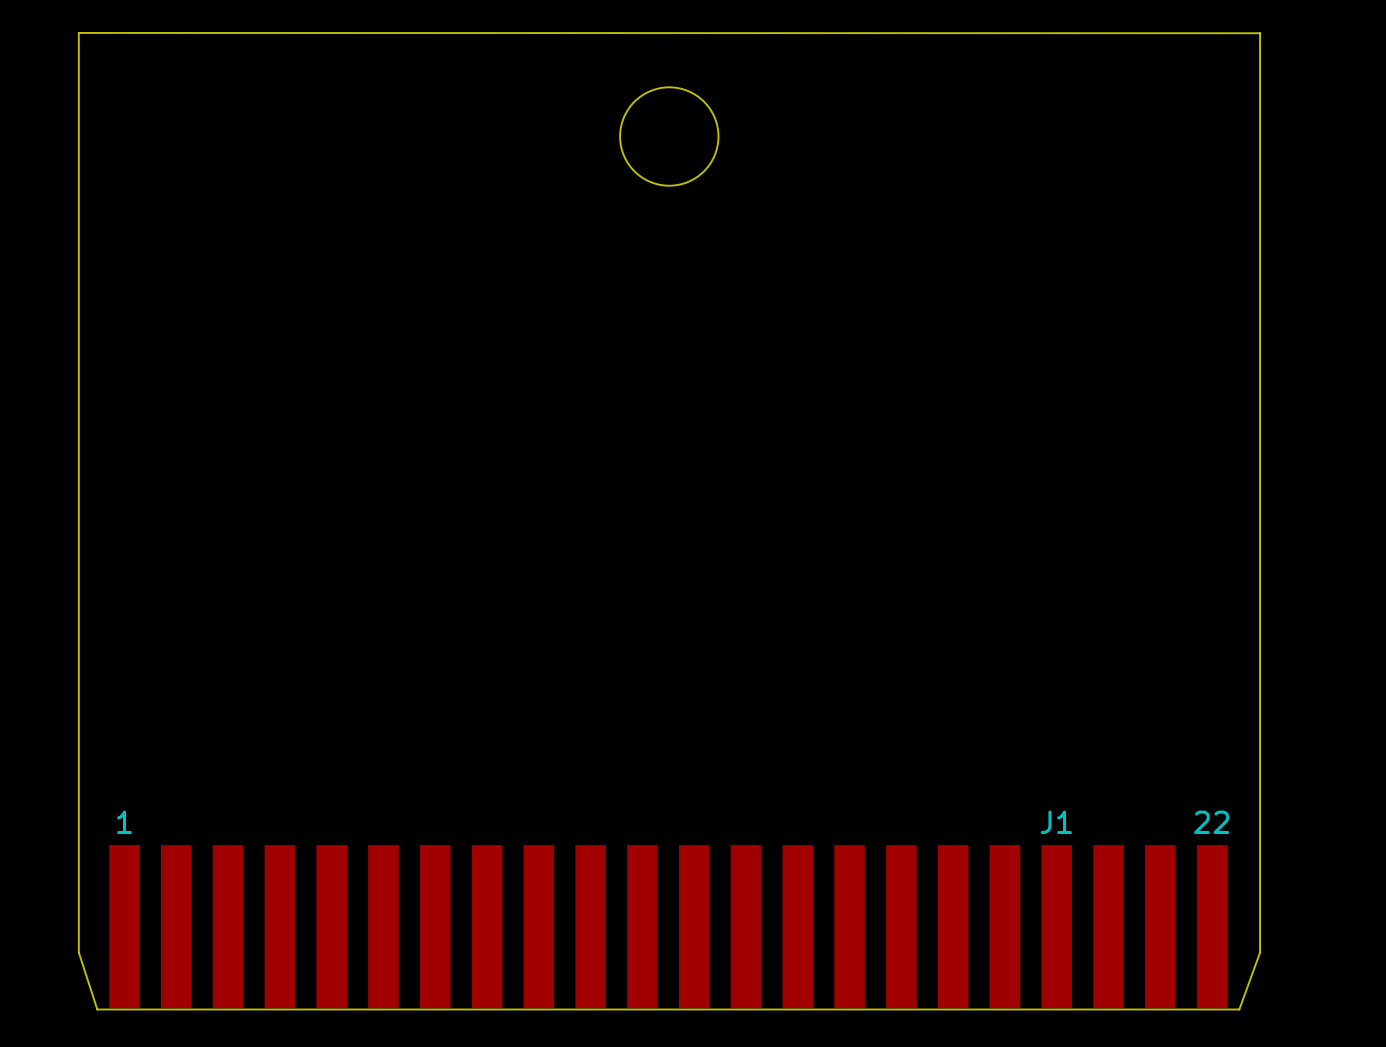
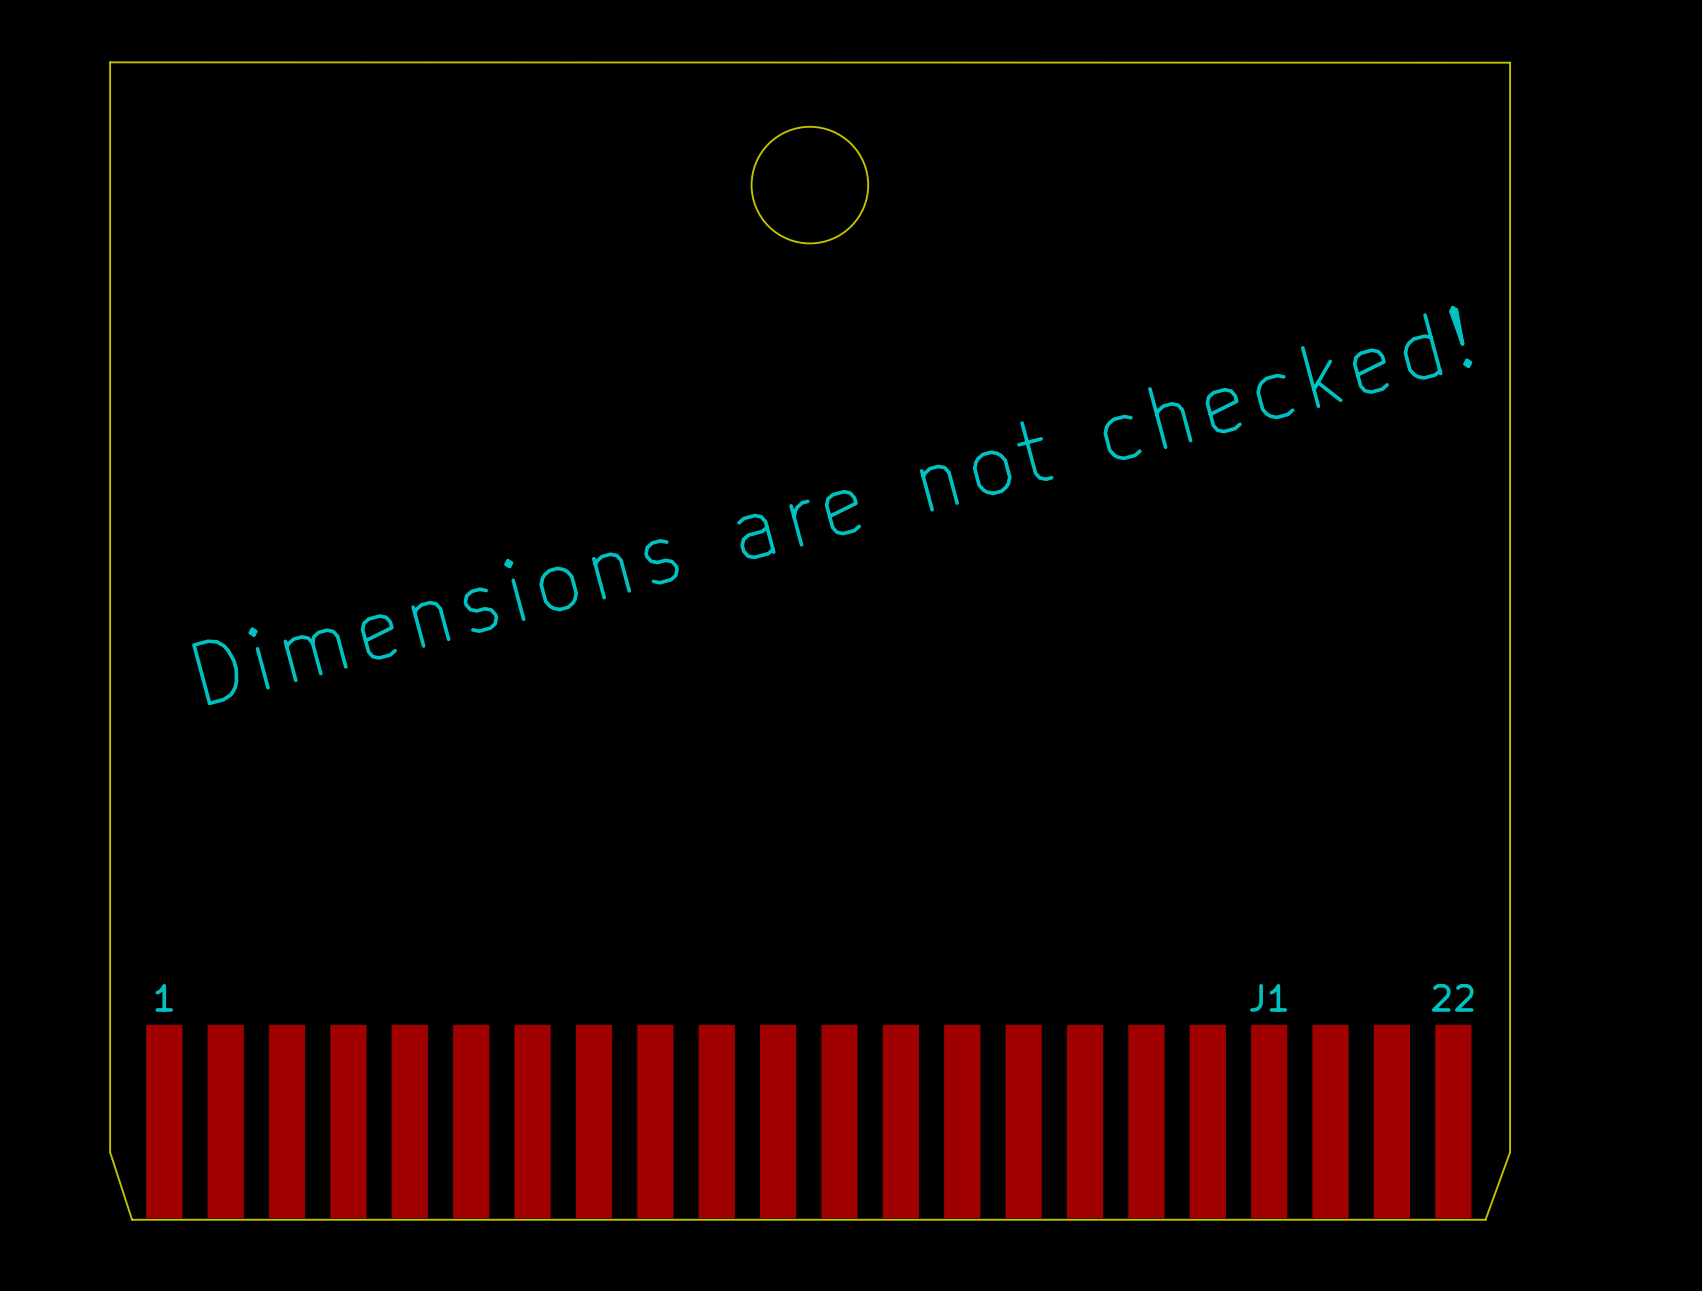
text: none -> Dimensions are not checked! (832, 505)

